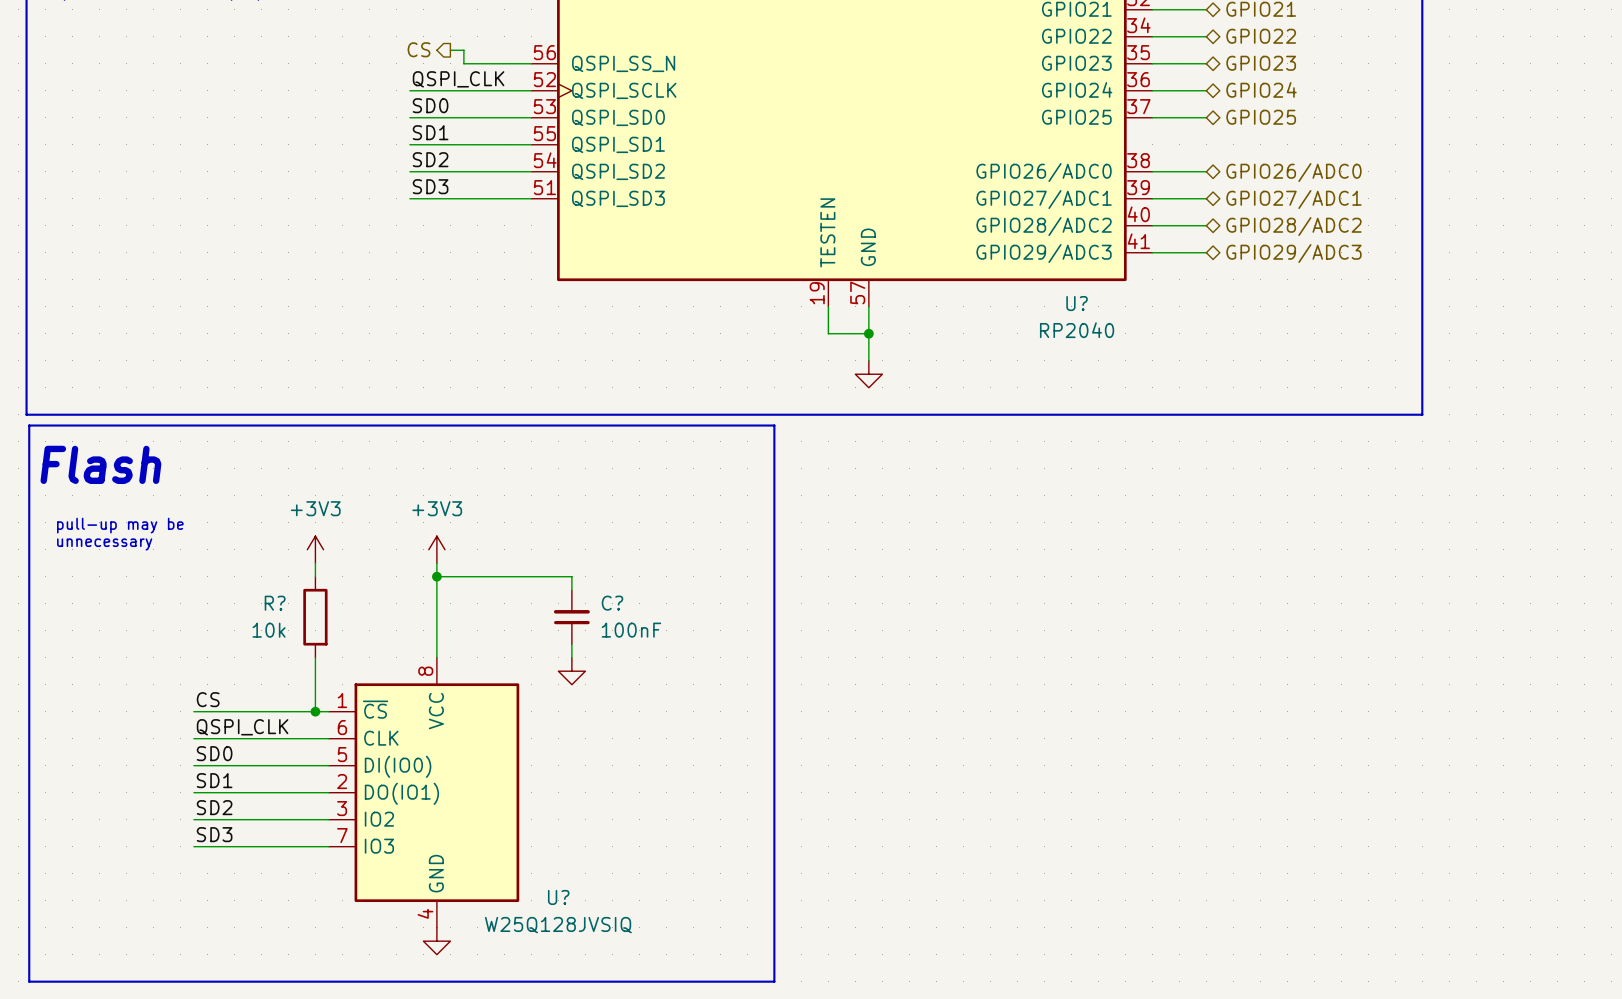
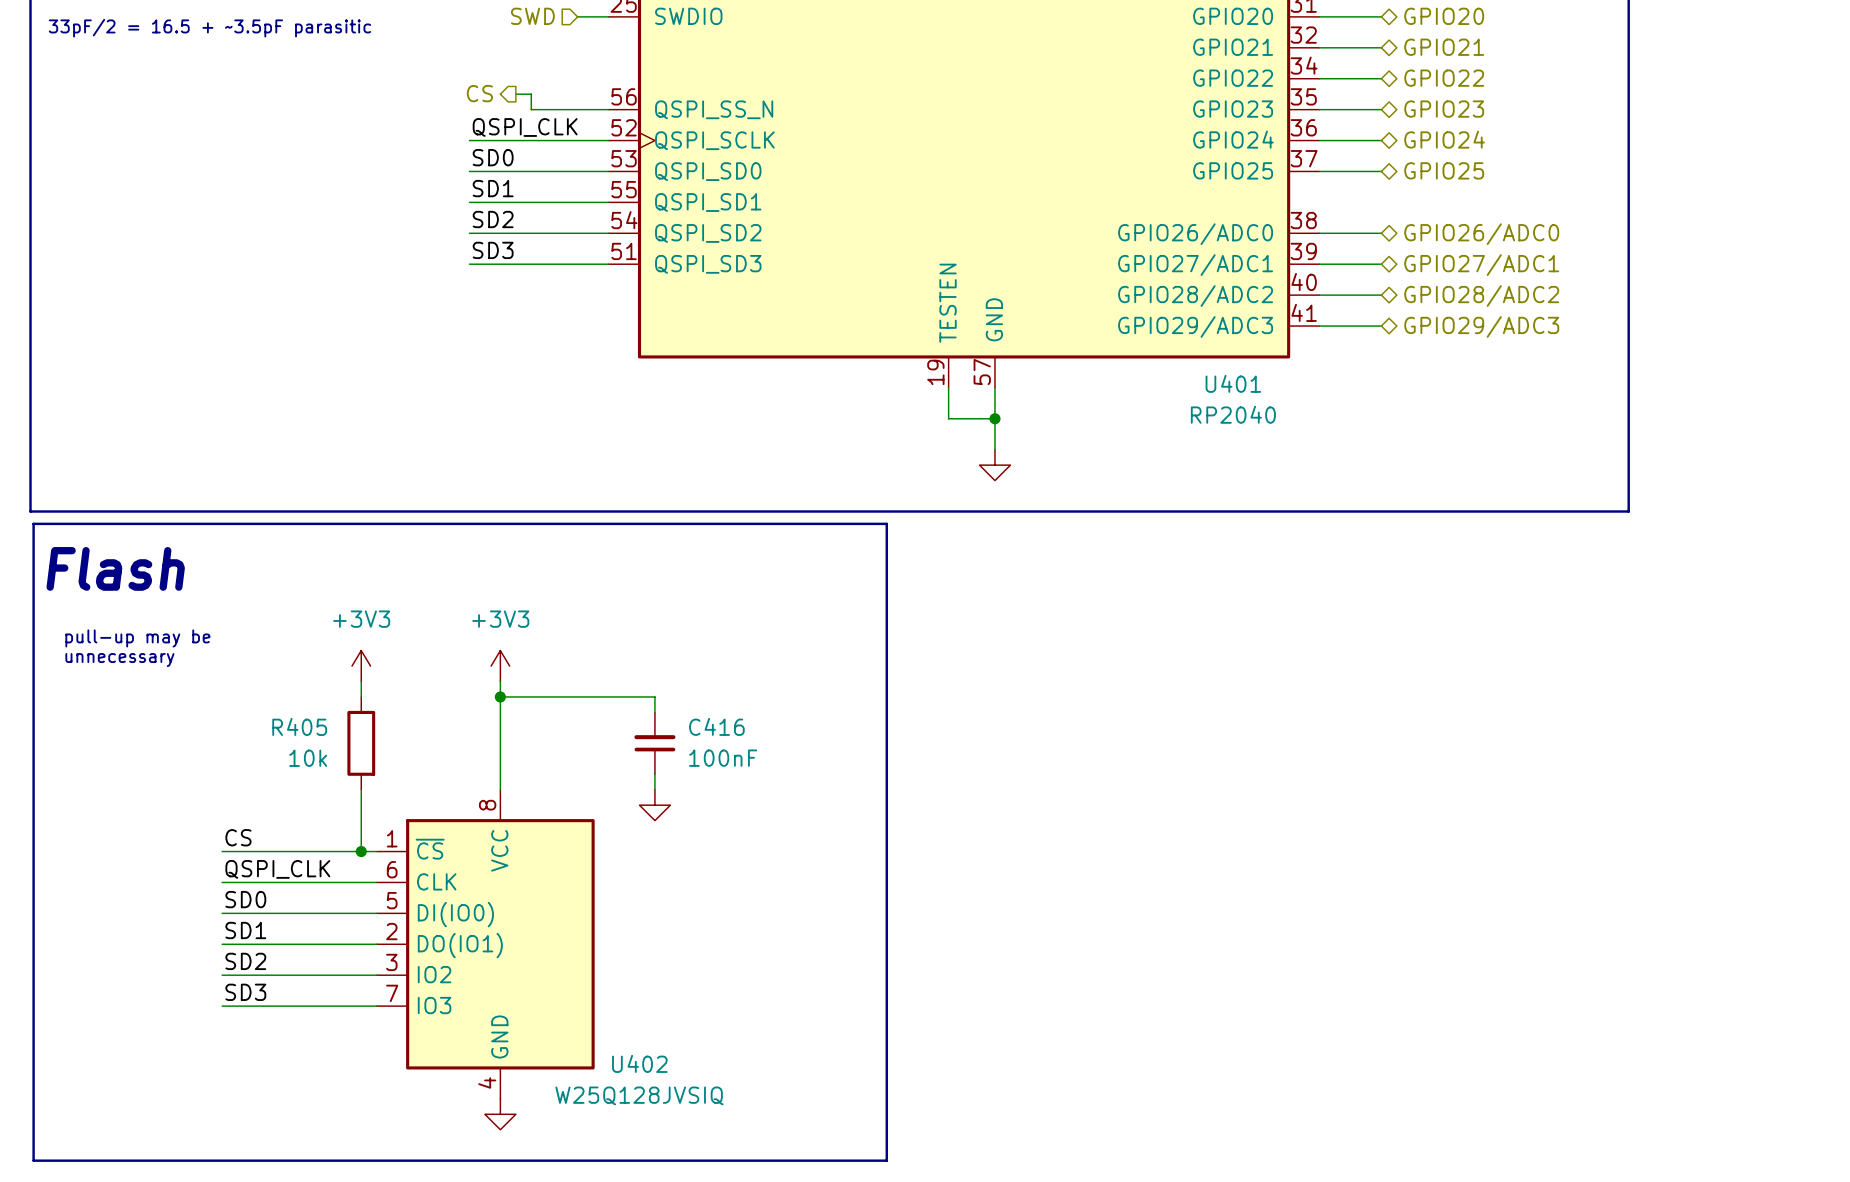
U? name: U? (1077, 303) -> U401 (1233, 383)
R? name: R? (275, 603) -> R405 (299, 726)
C? name: C? (612, 603) -> C416 (716, 726)
U? name: U? (558, 897) -> U402 (639, 1063)

